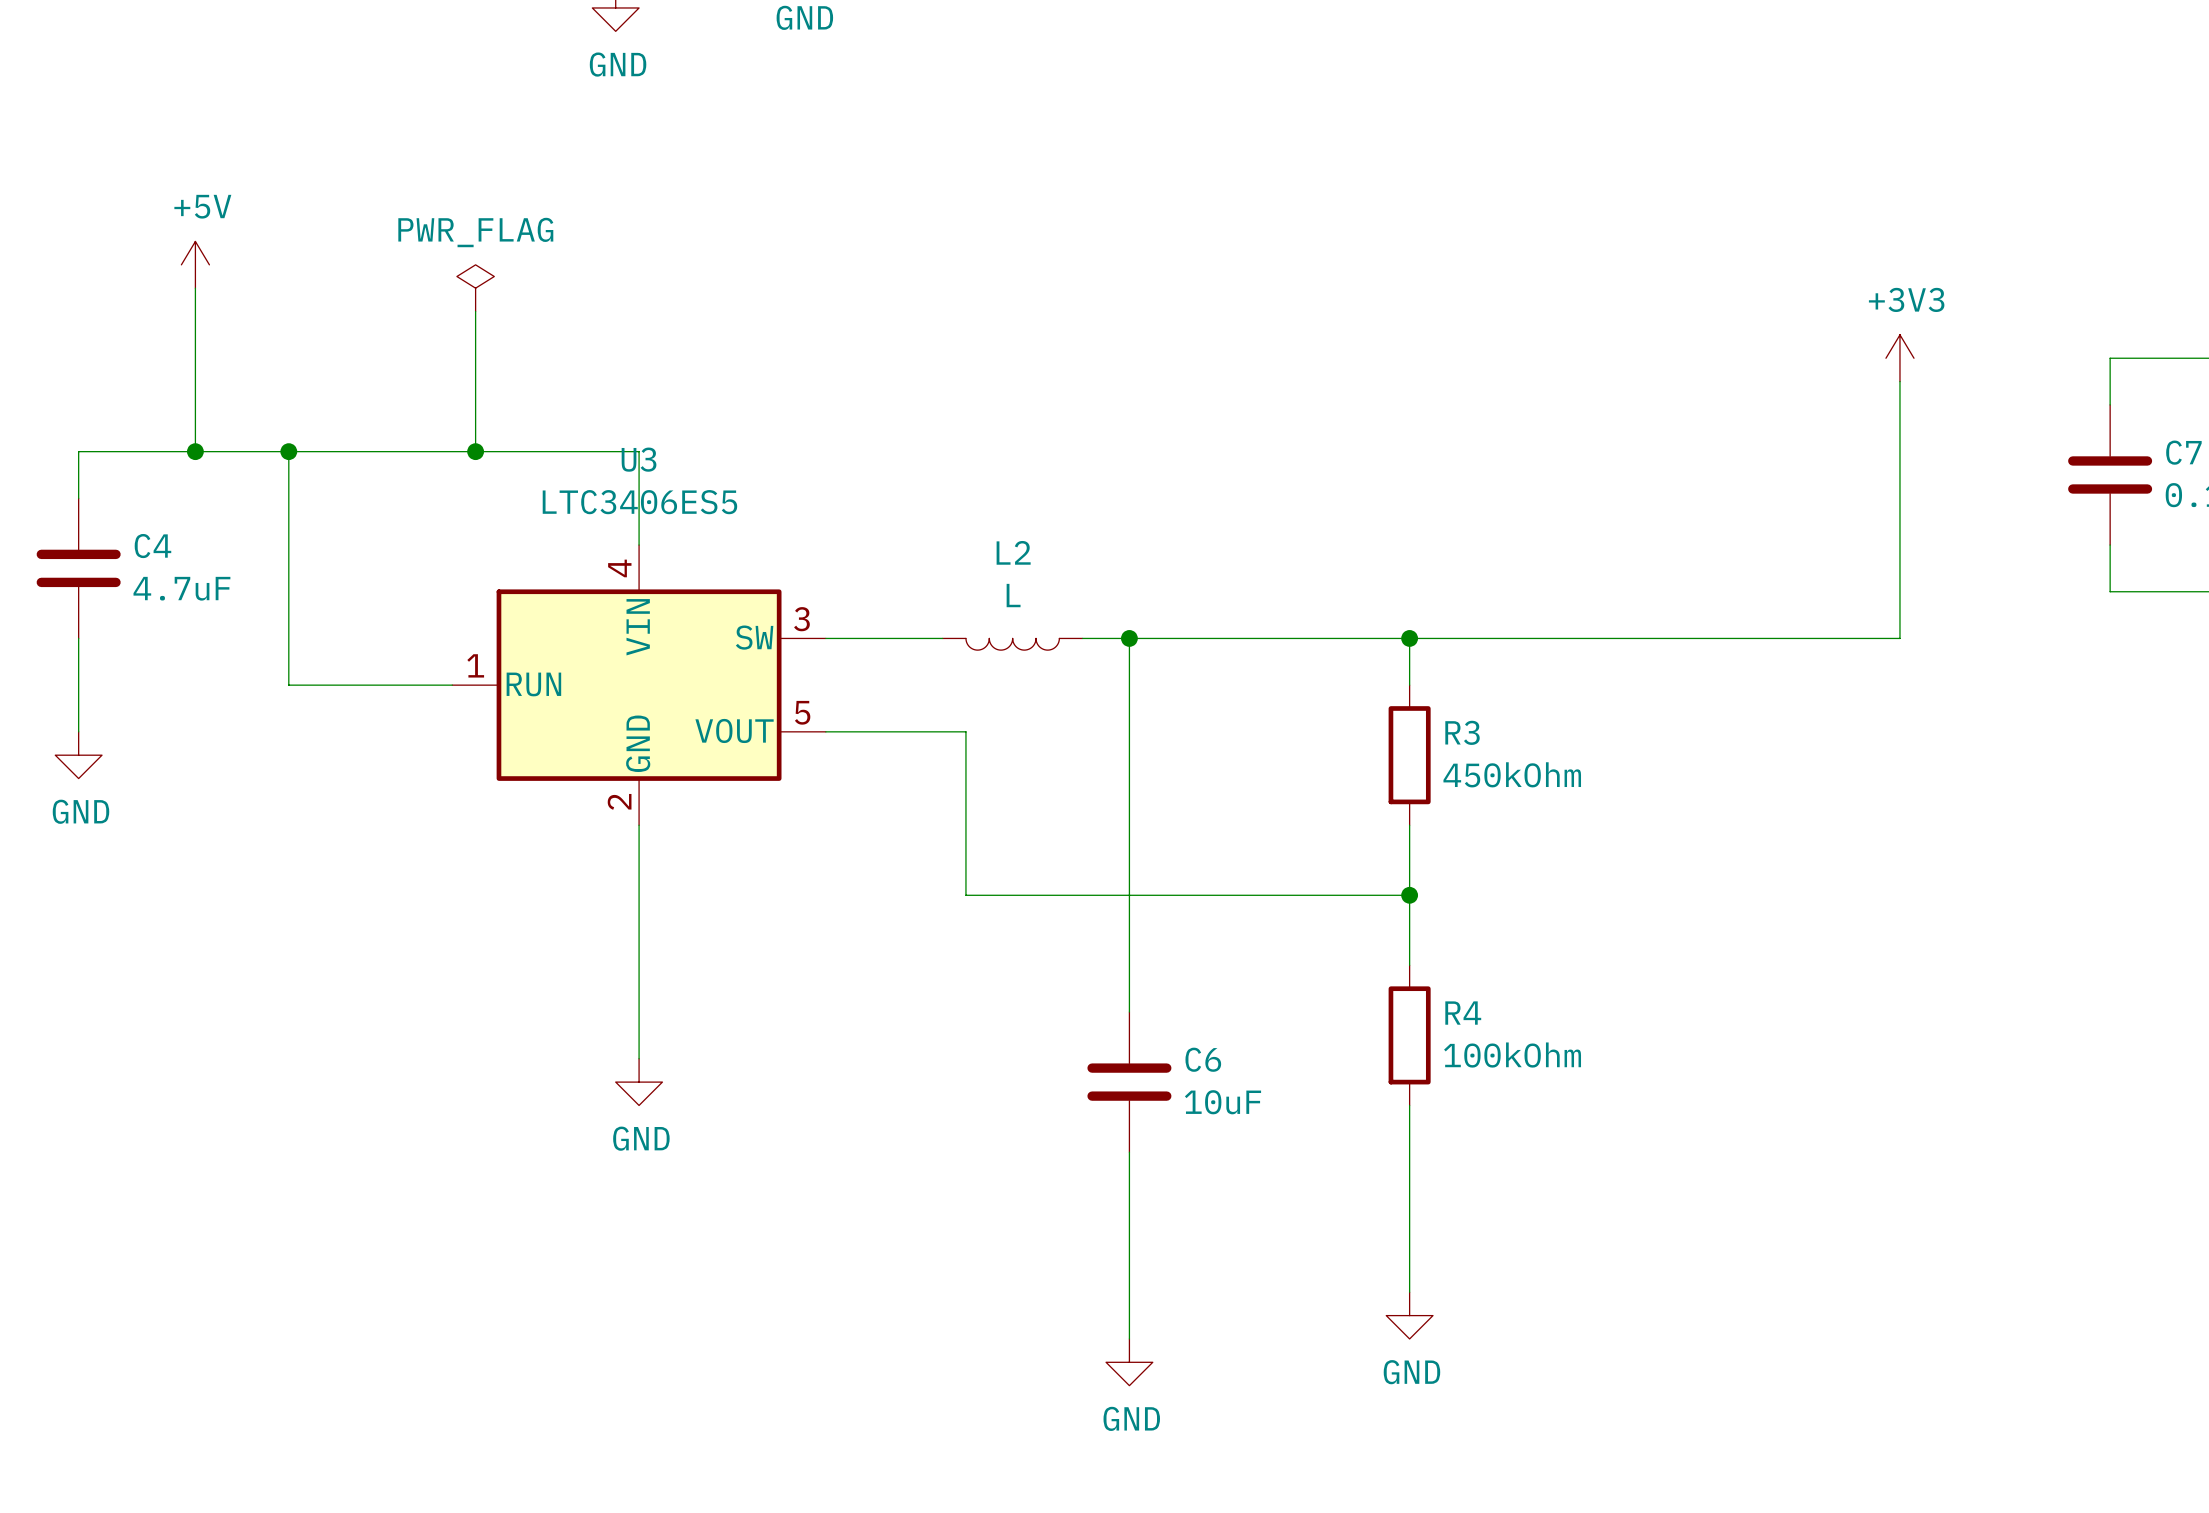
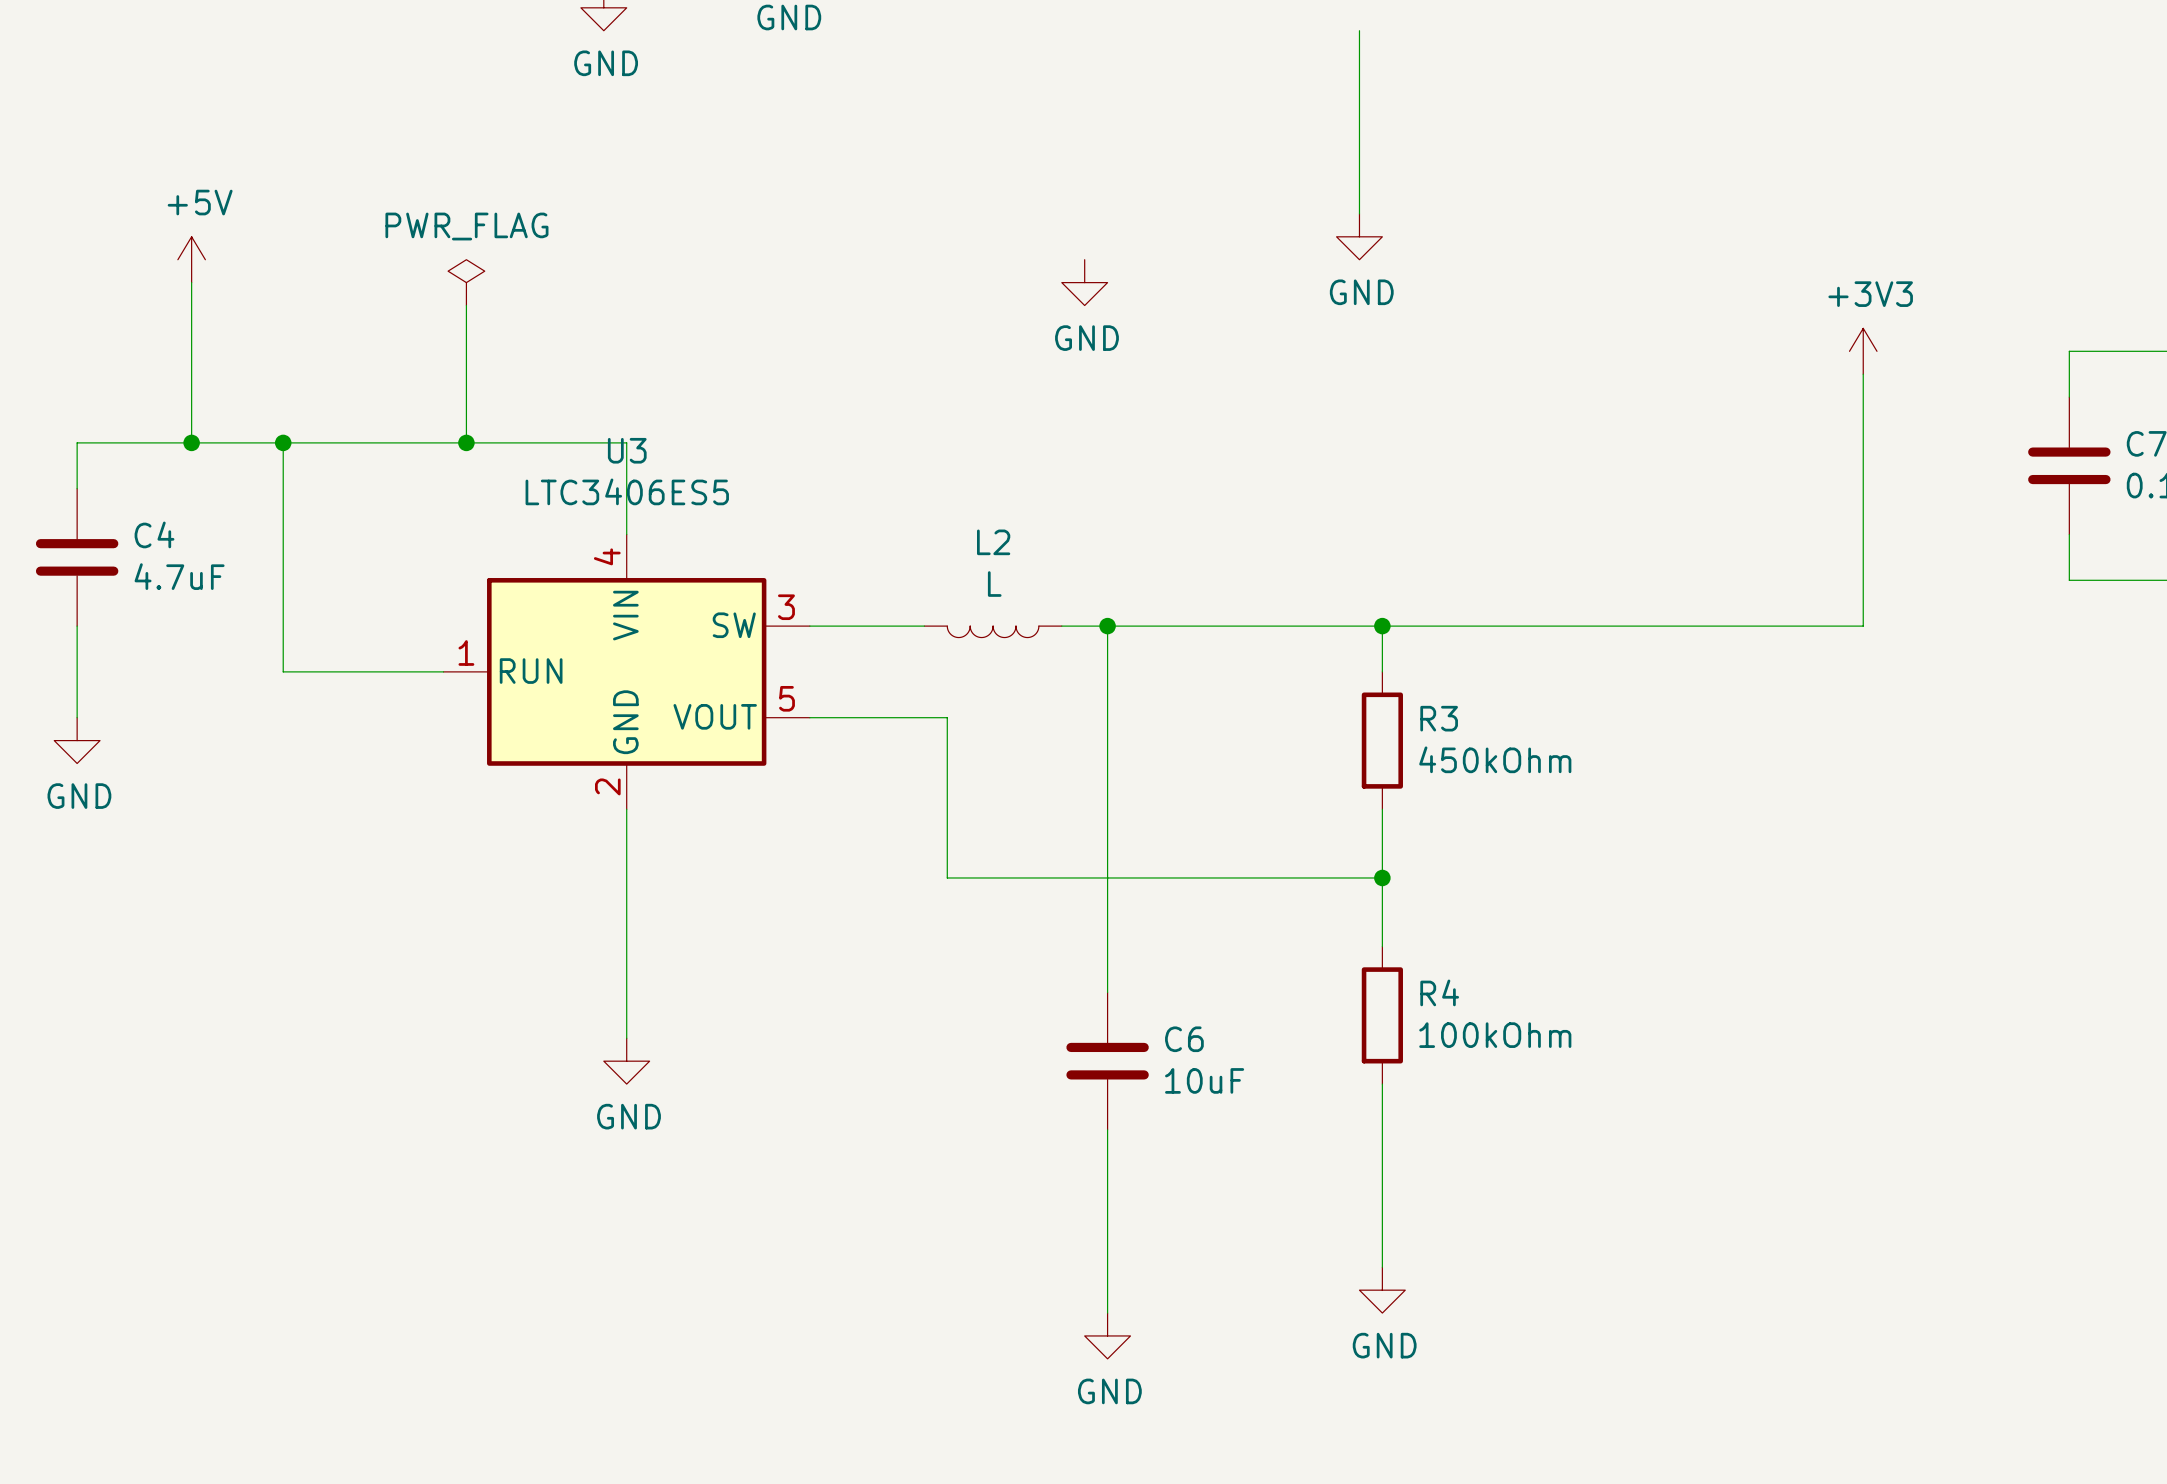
wire: none -> (1359, 30) (1359, 213)
power symbol: none -> GND (1359, 236)
power symbol: none -> GND (1084, 282)

